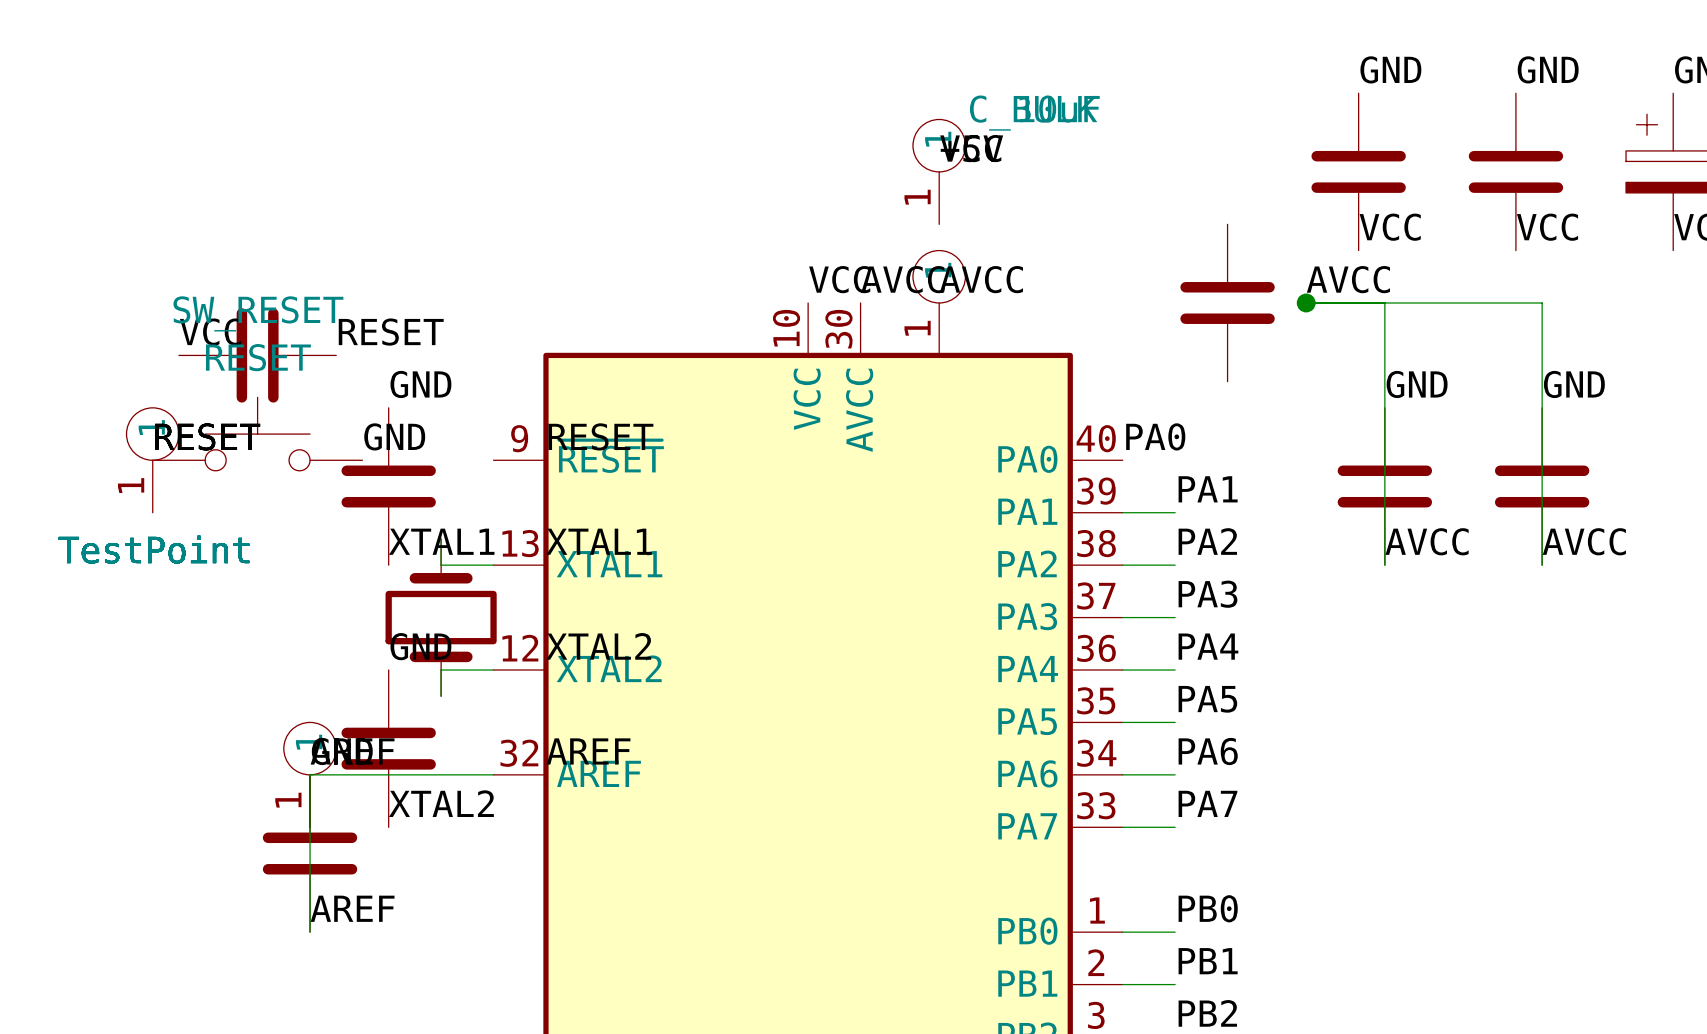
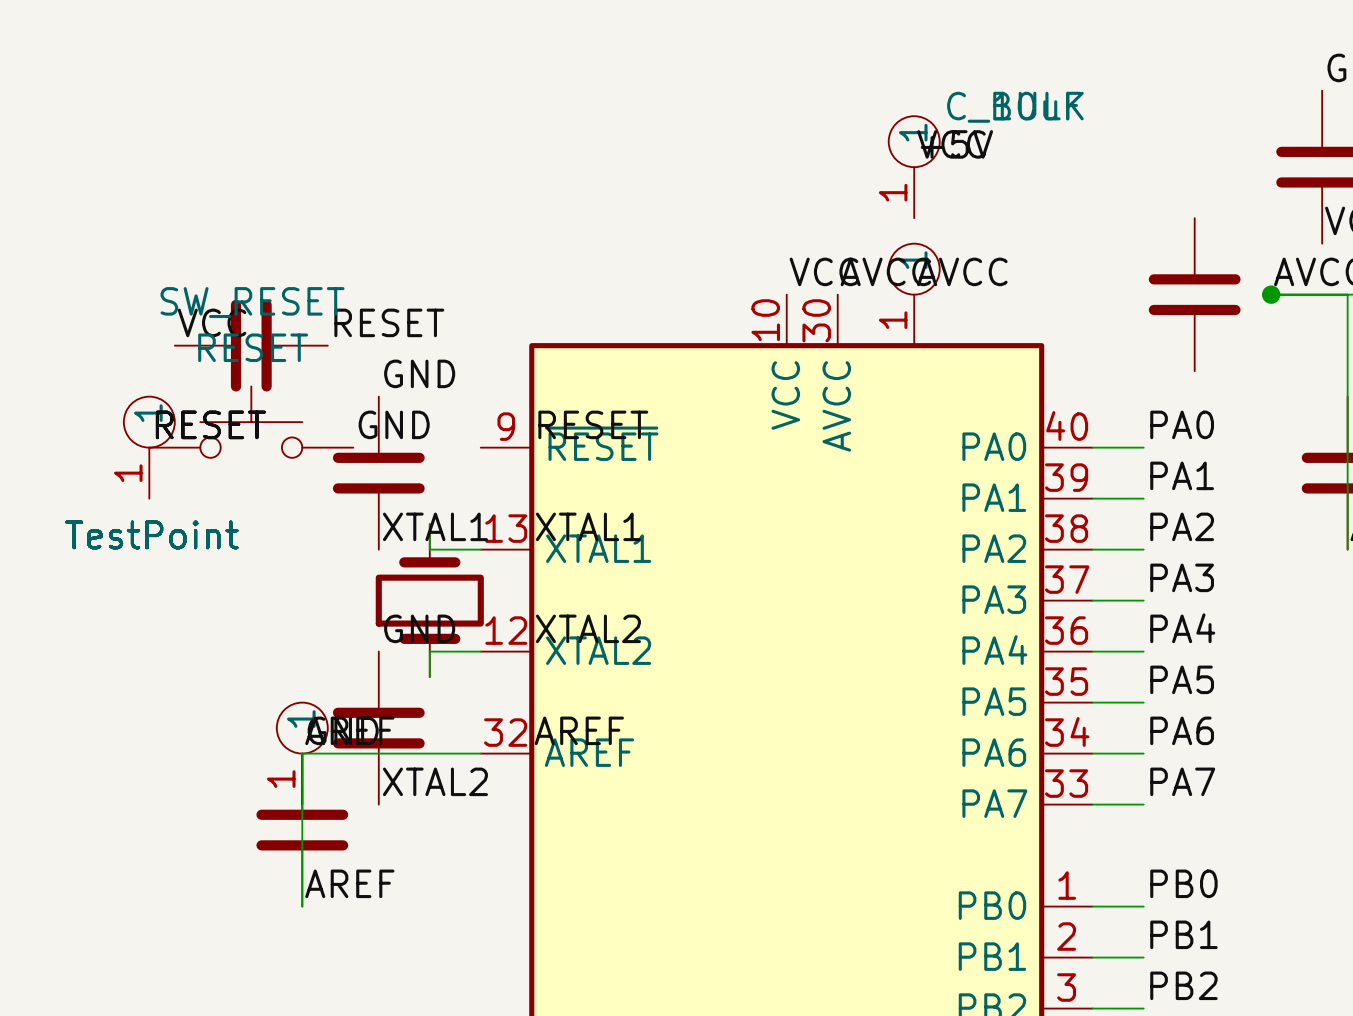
label position: PA0 (1155, 436) -> PA0 (1182, 424)
wire: none -> (1092, 447) (1143, 447)

